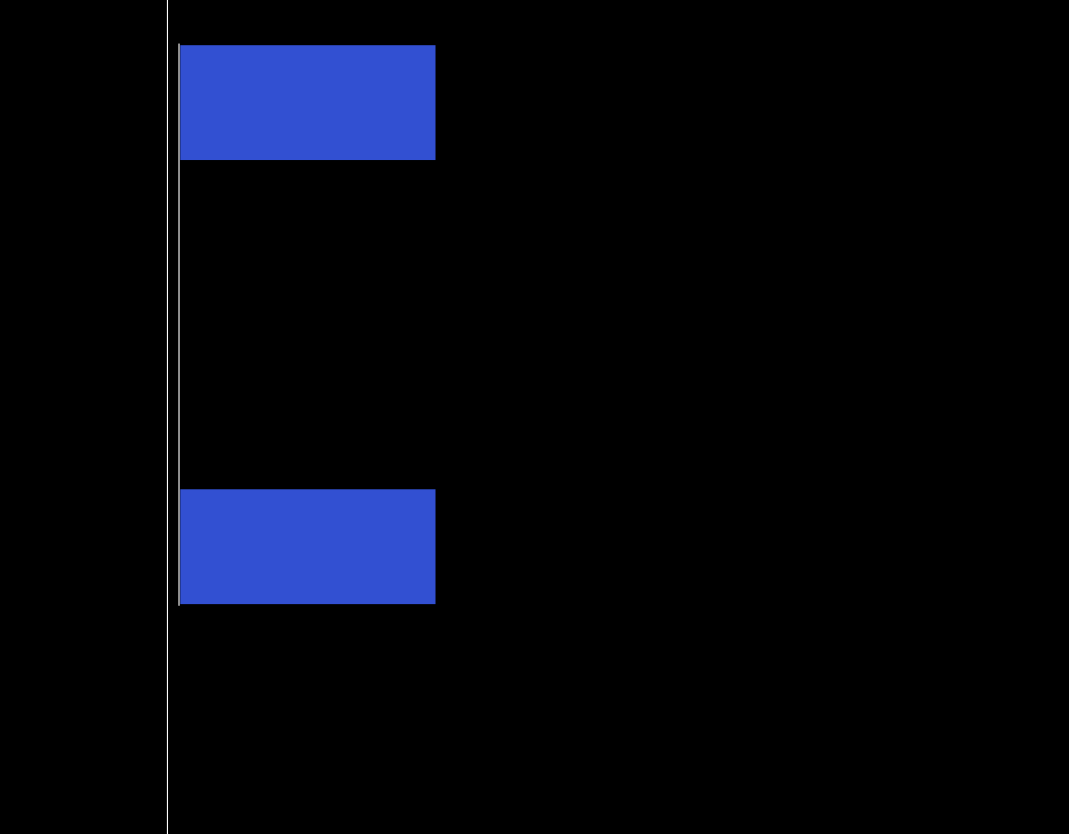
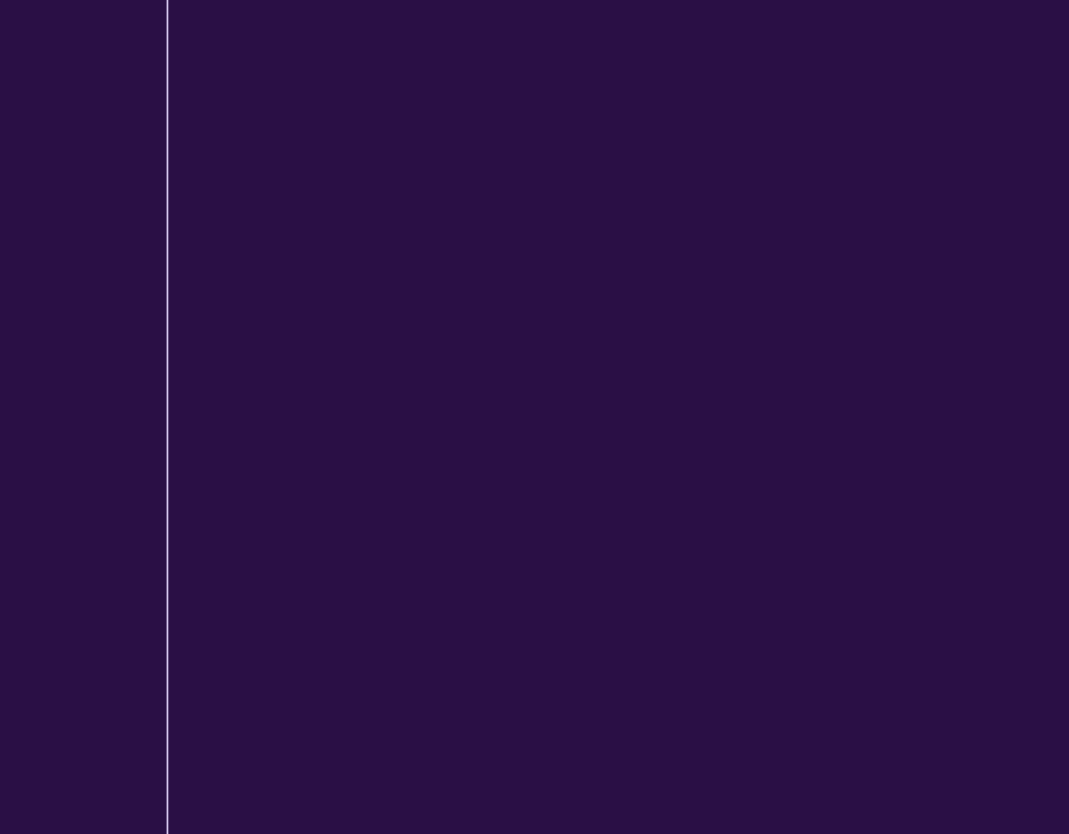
part: (307, 324) -> none

